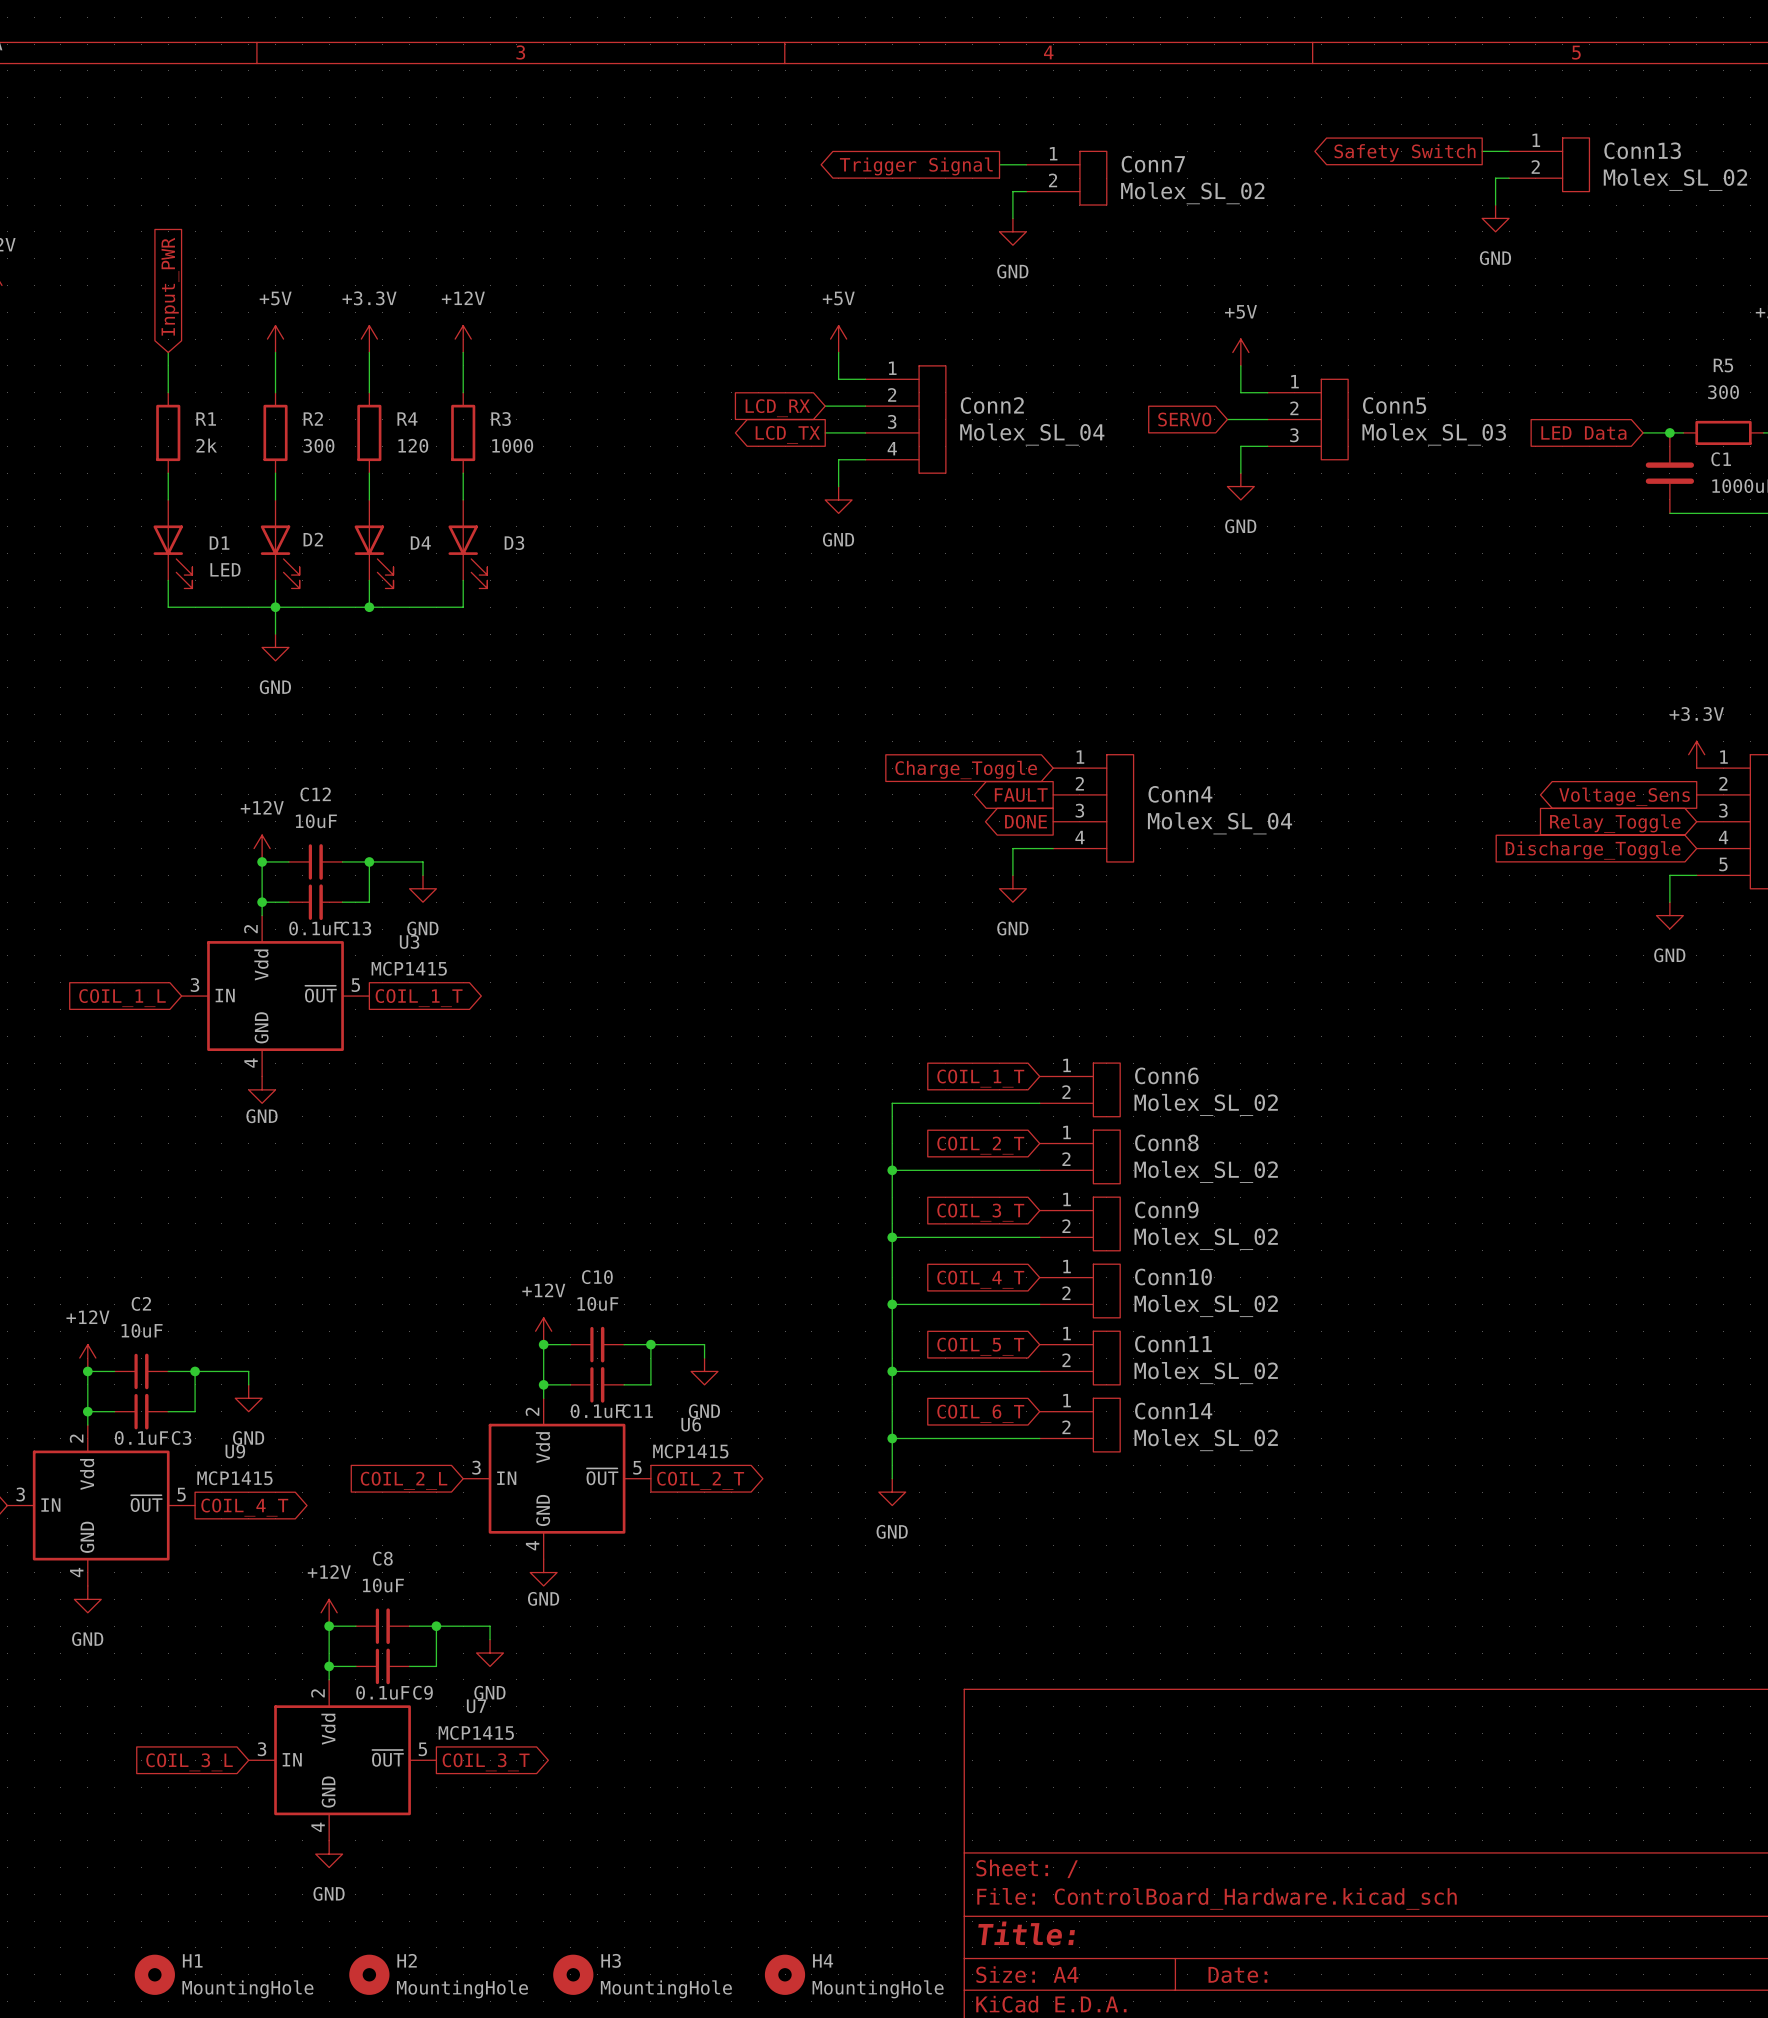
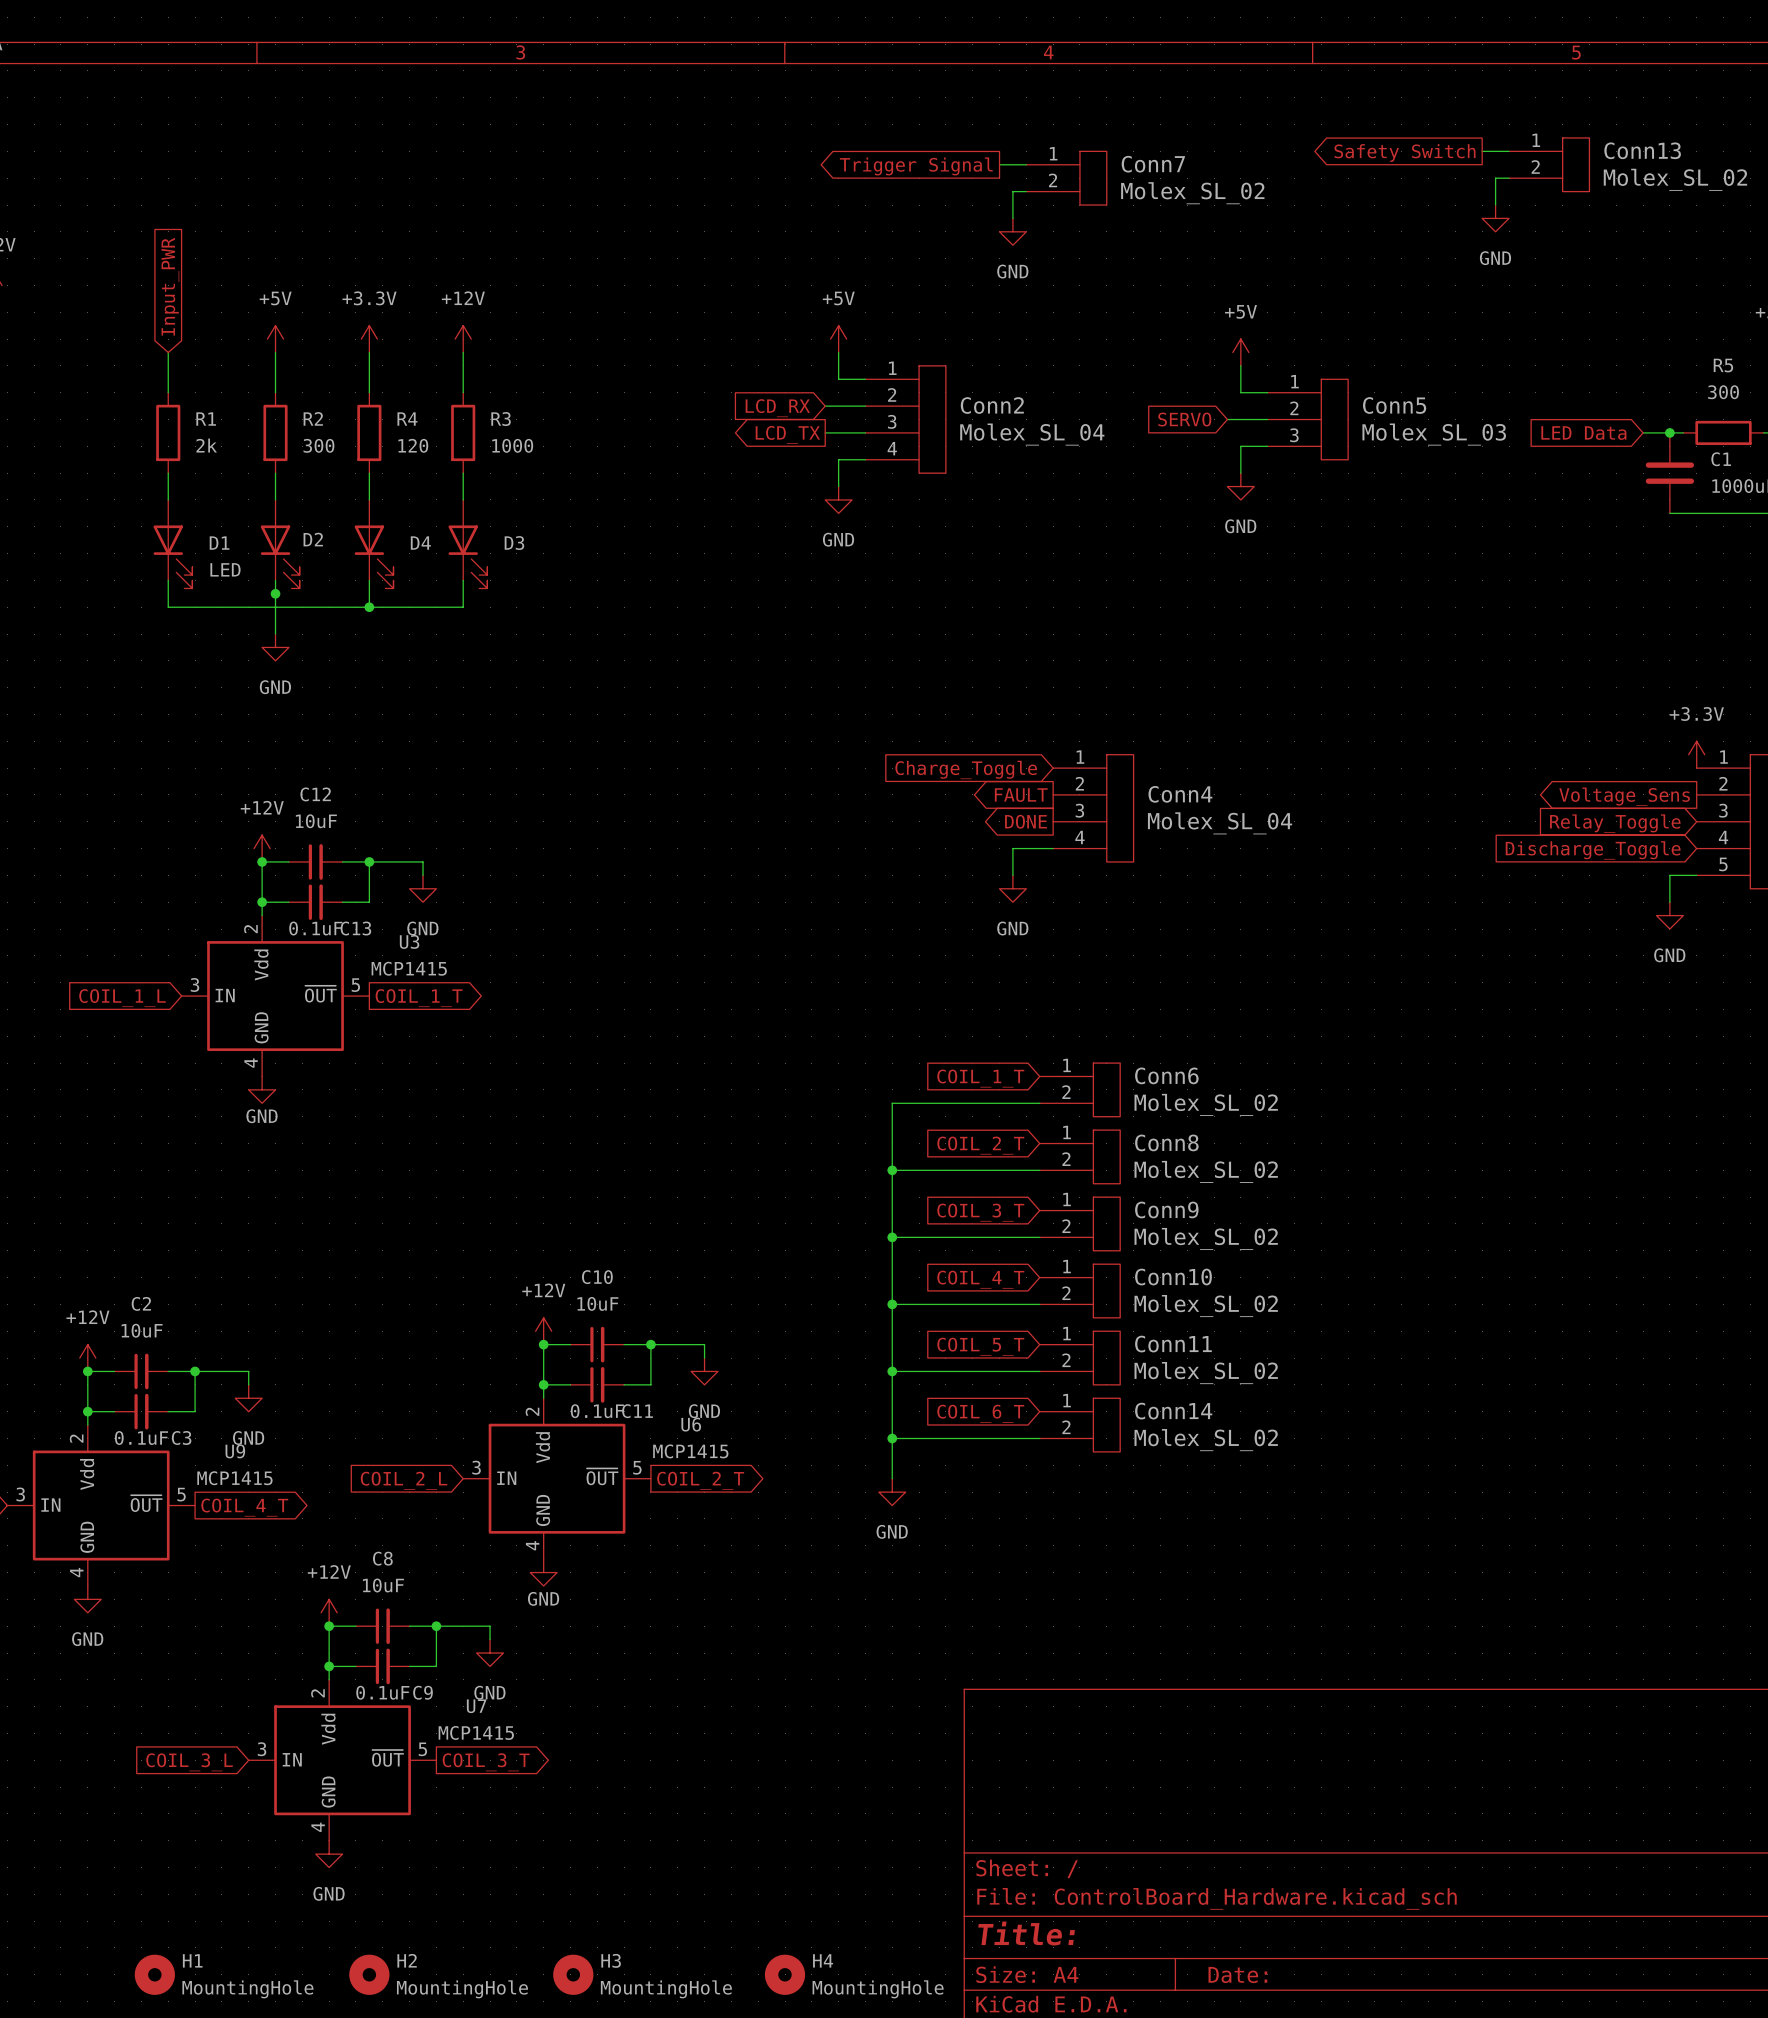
junction position: (275, 607) -> (275, 593)

